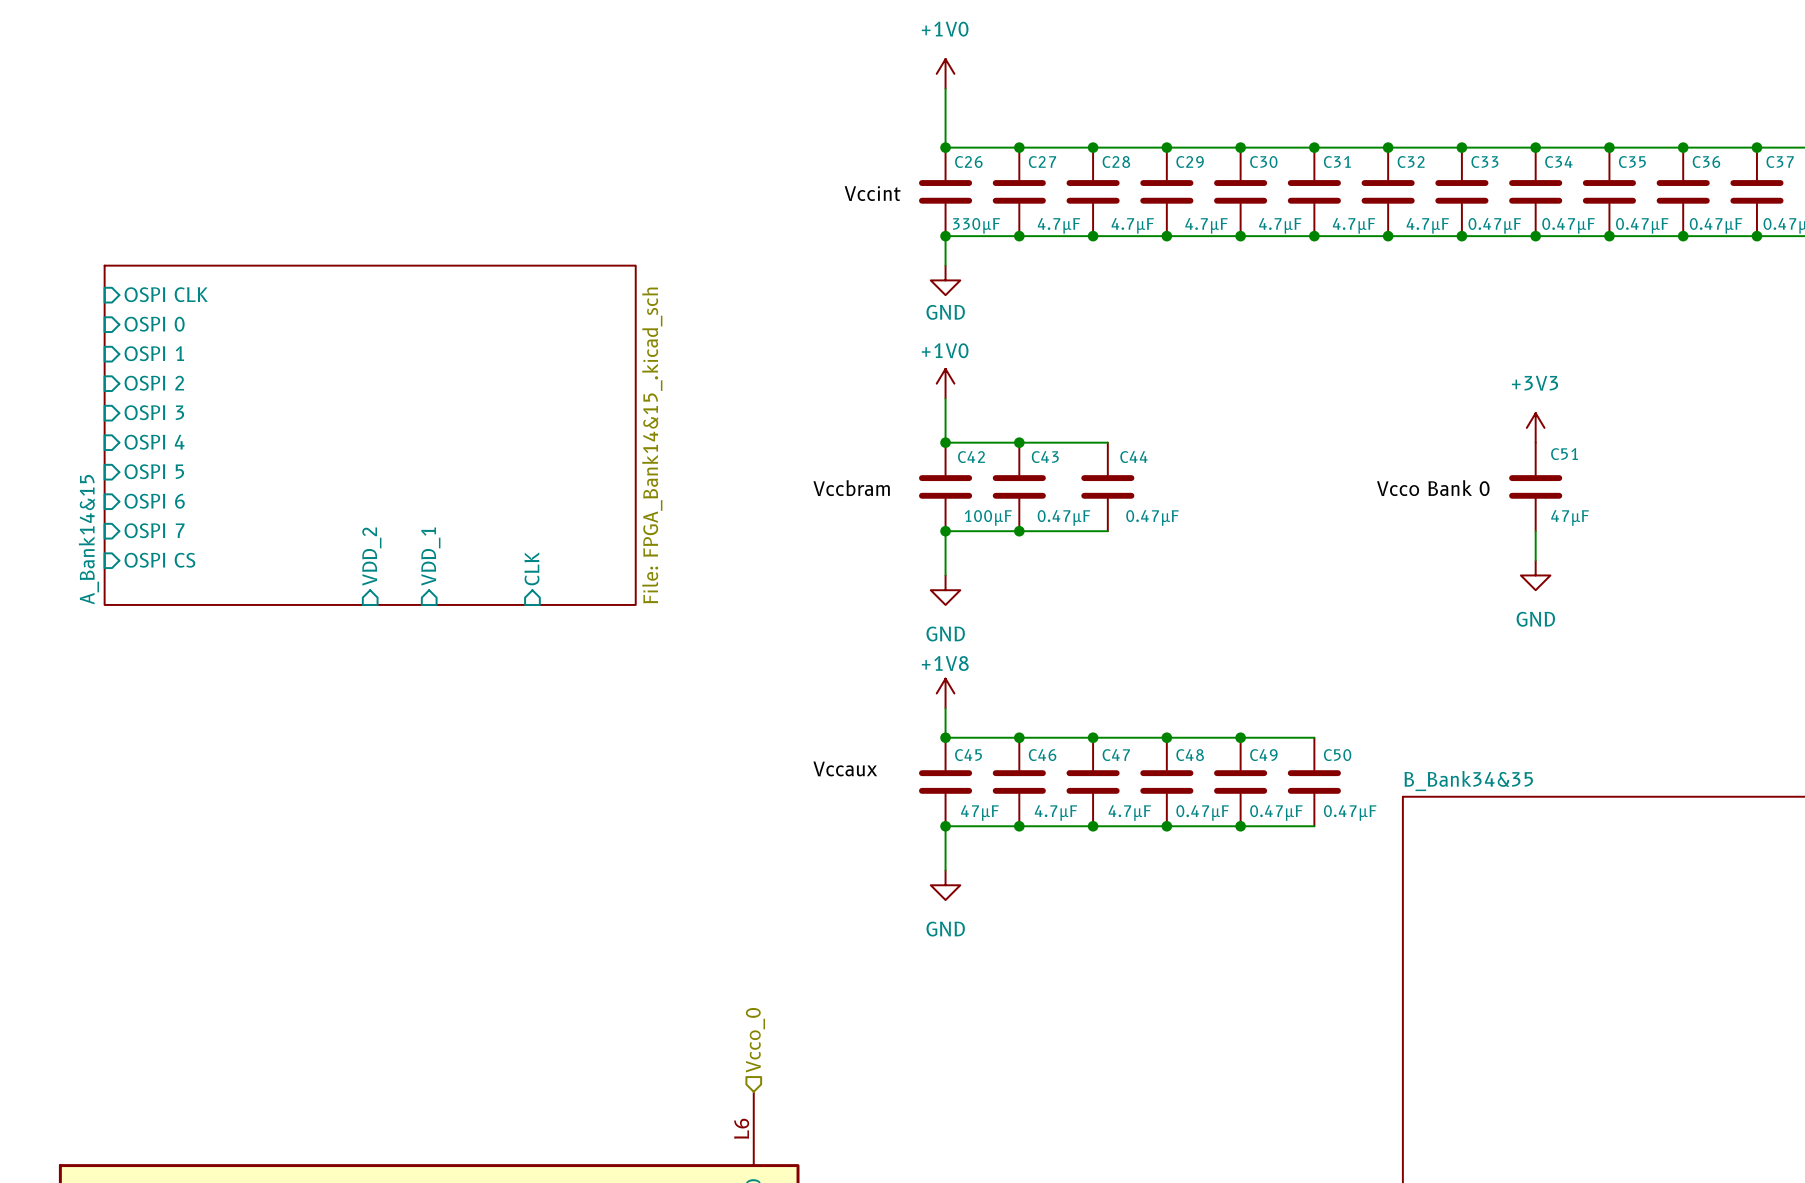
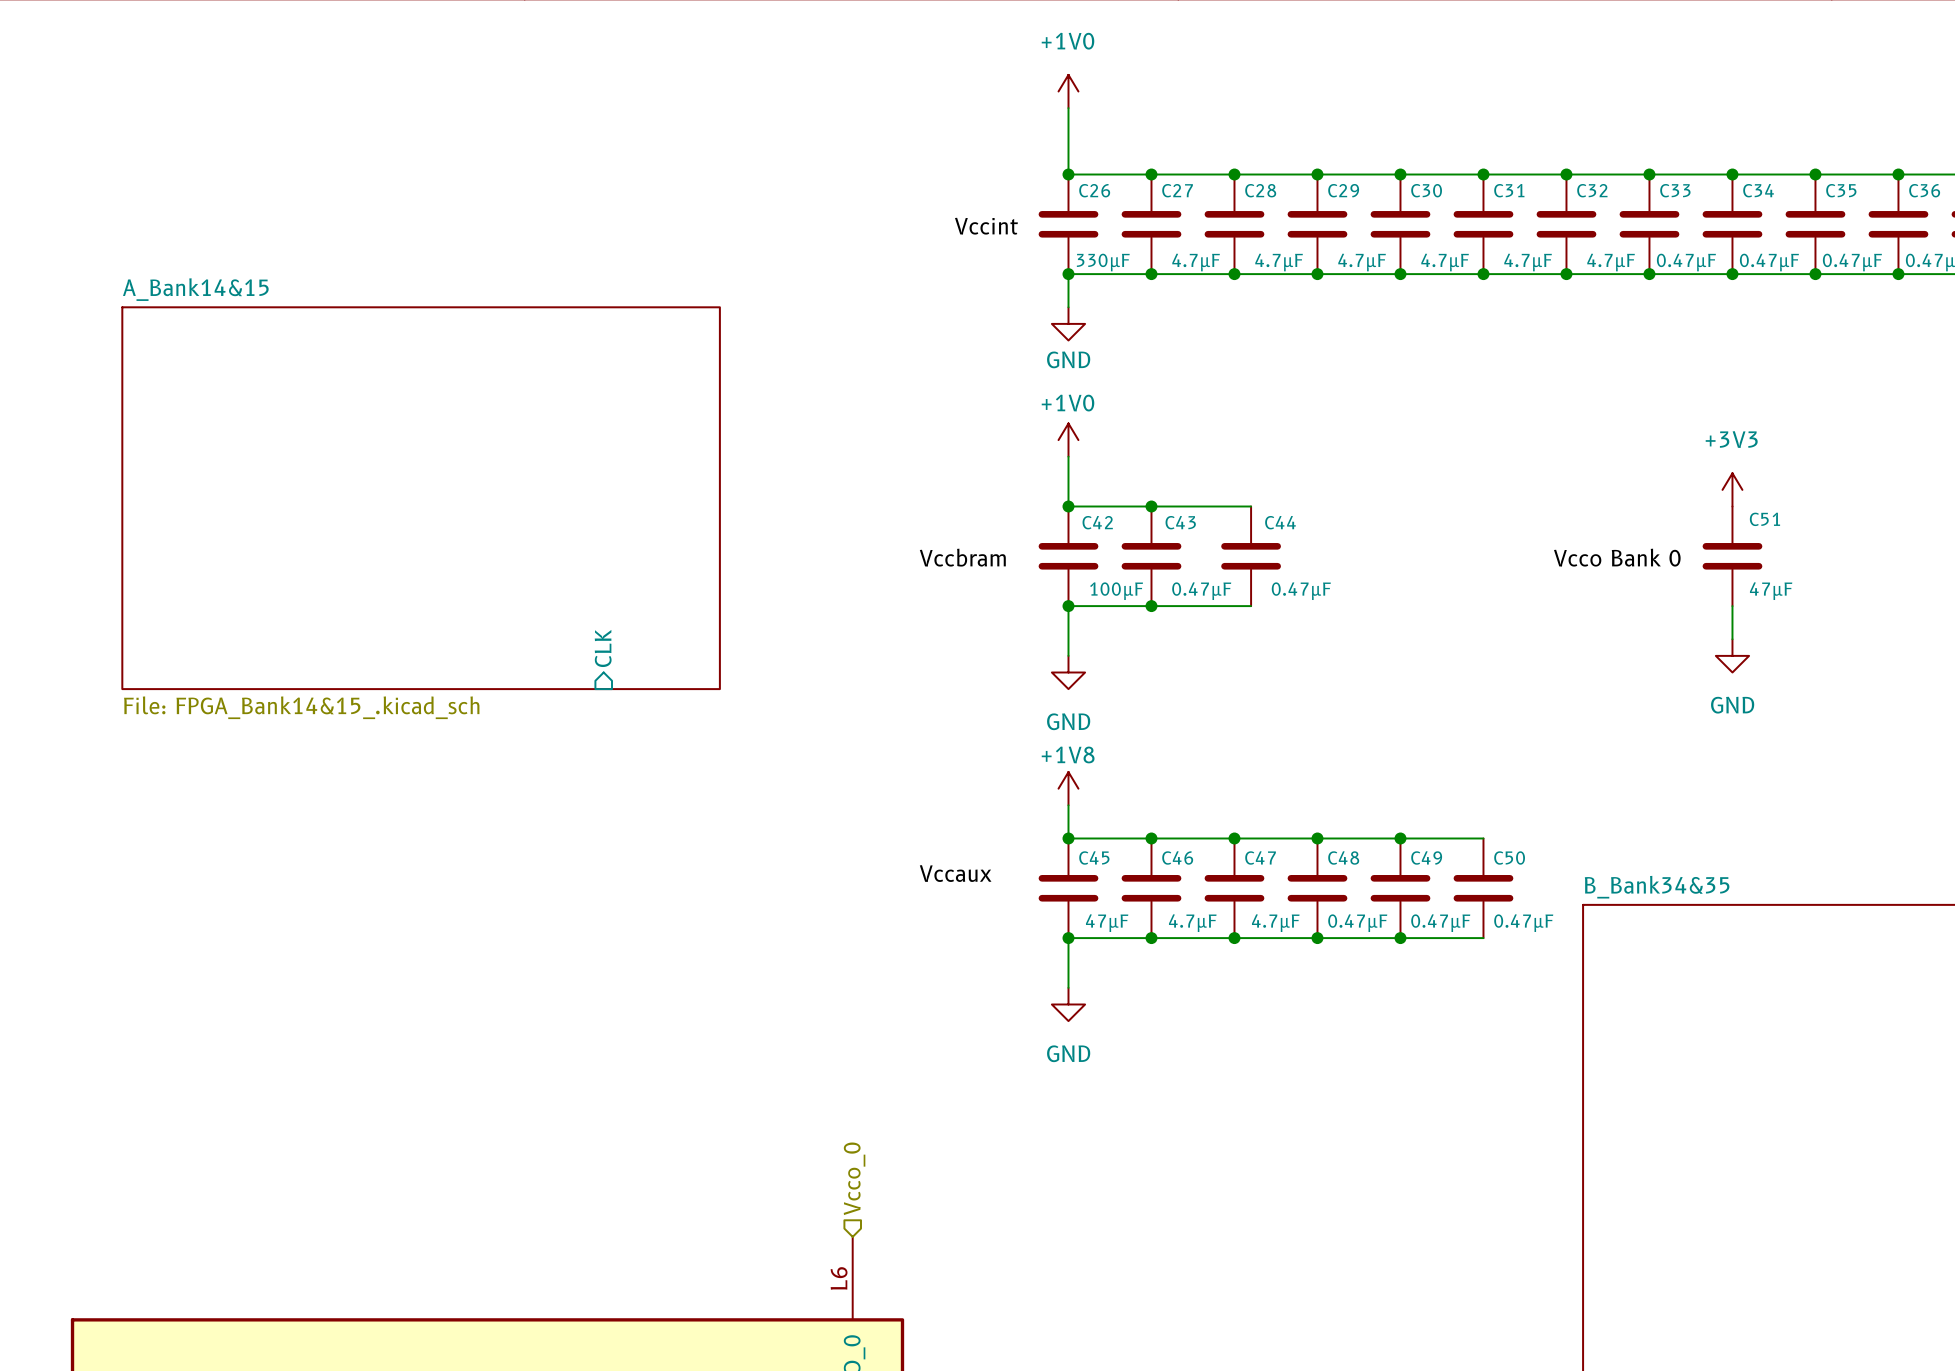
sheet pin: OSPI CLK (166, 294) -> none
sheet pin: OSPI 0 (154, 324) -> none
sheet pin: OSPI 1 (154, 353) -> none
sheet pin: OSPI 2 (154, 383) -> none
sheet pin: OSPI 3 (154, 412) -> none
sheet pin: OSPI 4 (154, 442) -> none
sheet A_Bank14&15 value rotation: 0° (652, 445) -> 90° clockwise (301, 707)
sheet pin: OSPI 5 (154, 471) -> none
sheet pin: OSPI 6 (154, 501) -> none
sheet pin: OSPI 7 (154, 530) -> none
sheet A_Bank14&15 name rotation: 0° (88, 539) -> 90° clockwise (195, 289)
sheet A_Bank14&15 name position: A_Bank14&15 (88, 539) -> A_Bank14&15 (195, 289)
sheet pin: VDD_2 (371, 556) -> none
sheet pin: VDD_1 (430, 556) -> none
sheet pin: OSPI CS (159, 560) -> none

